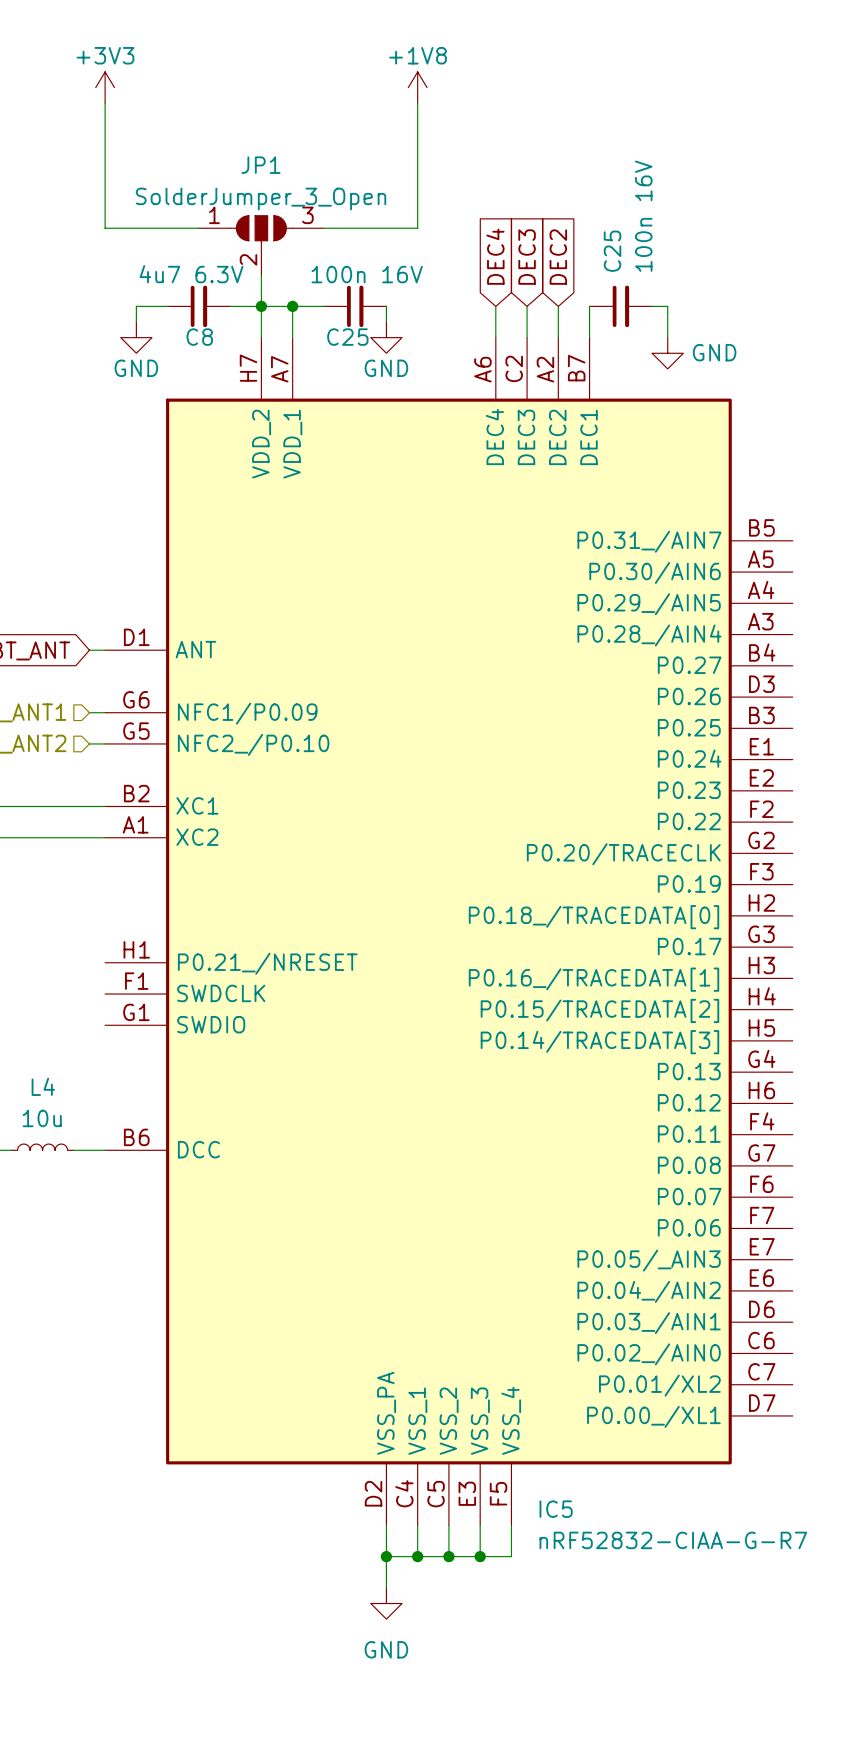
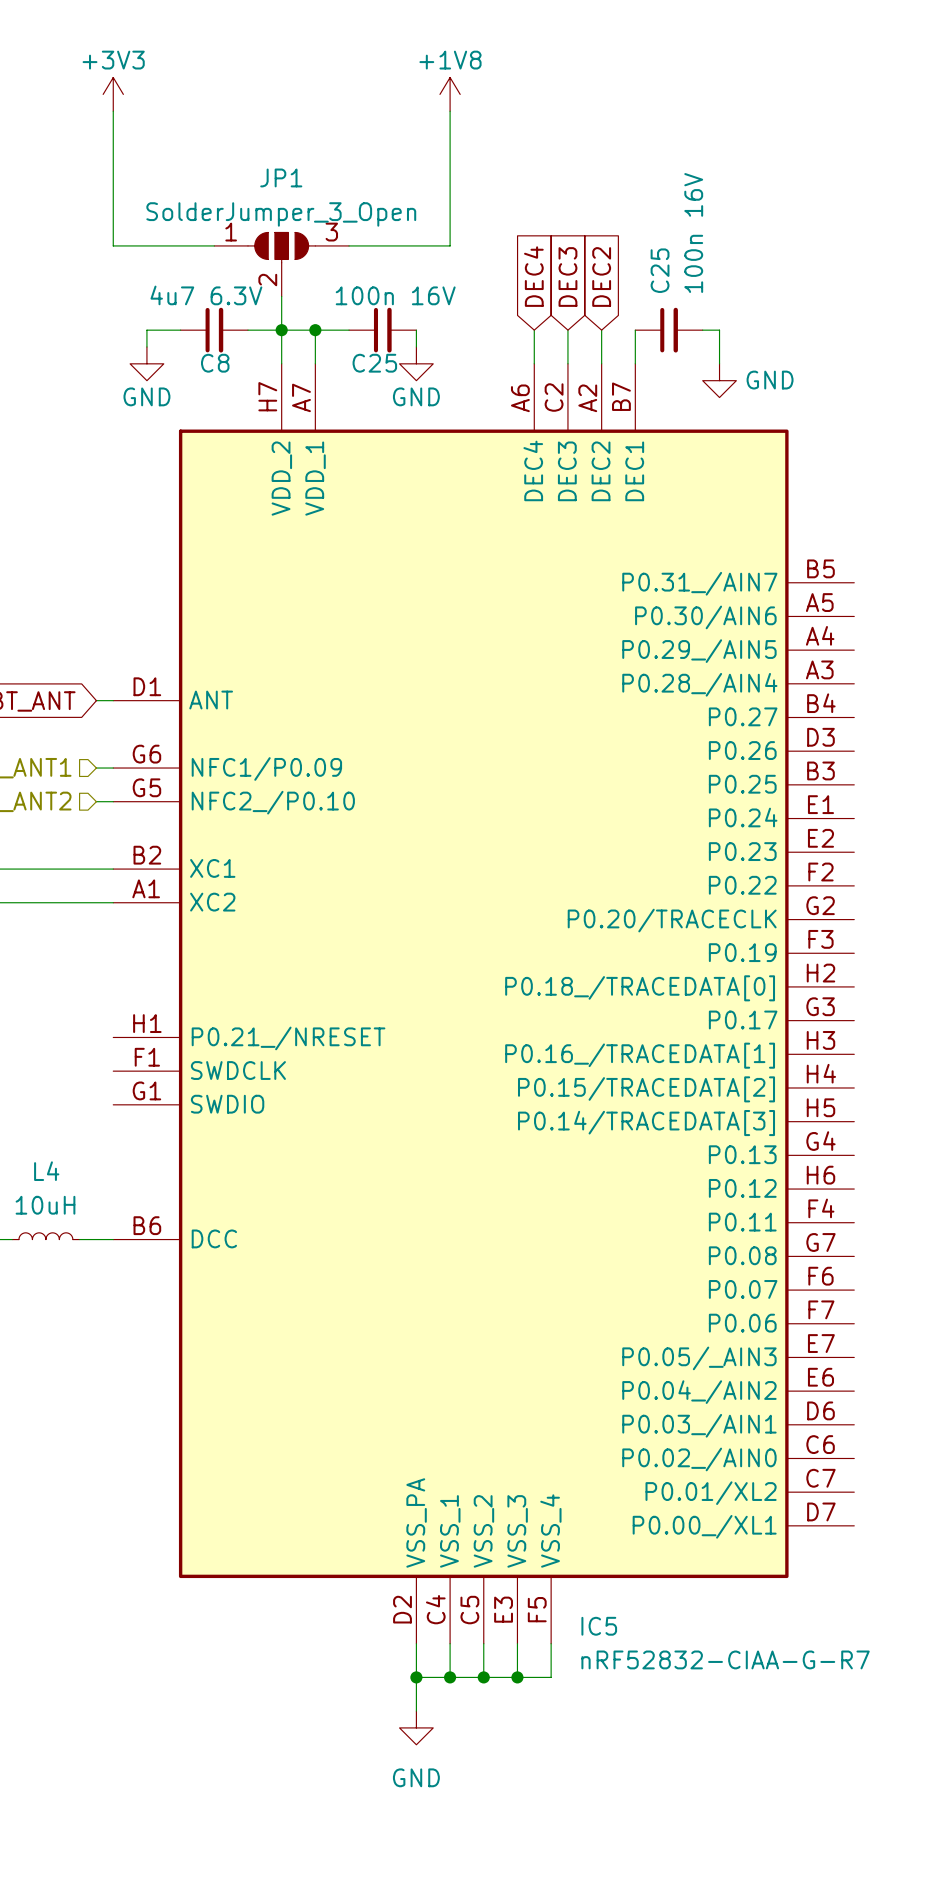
L4 value: 10u (42, 1118) -> 10uH (45, 1205)

